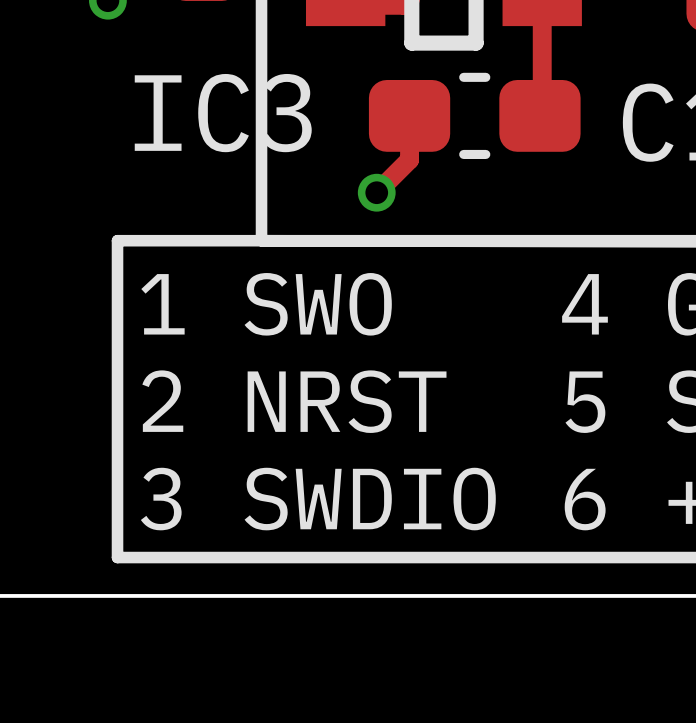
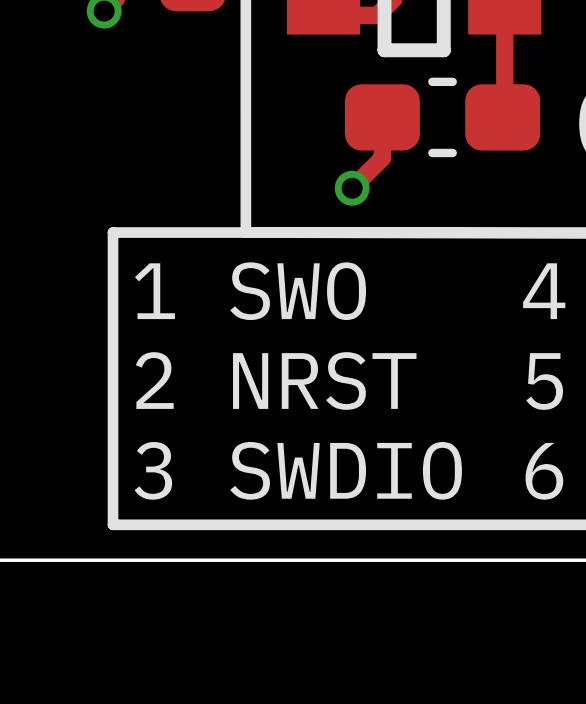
IC3 name: IC3 (223, 113) -> none

